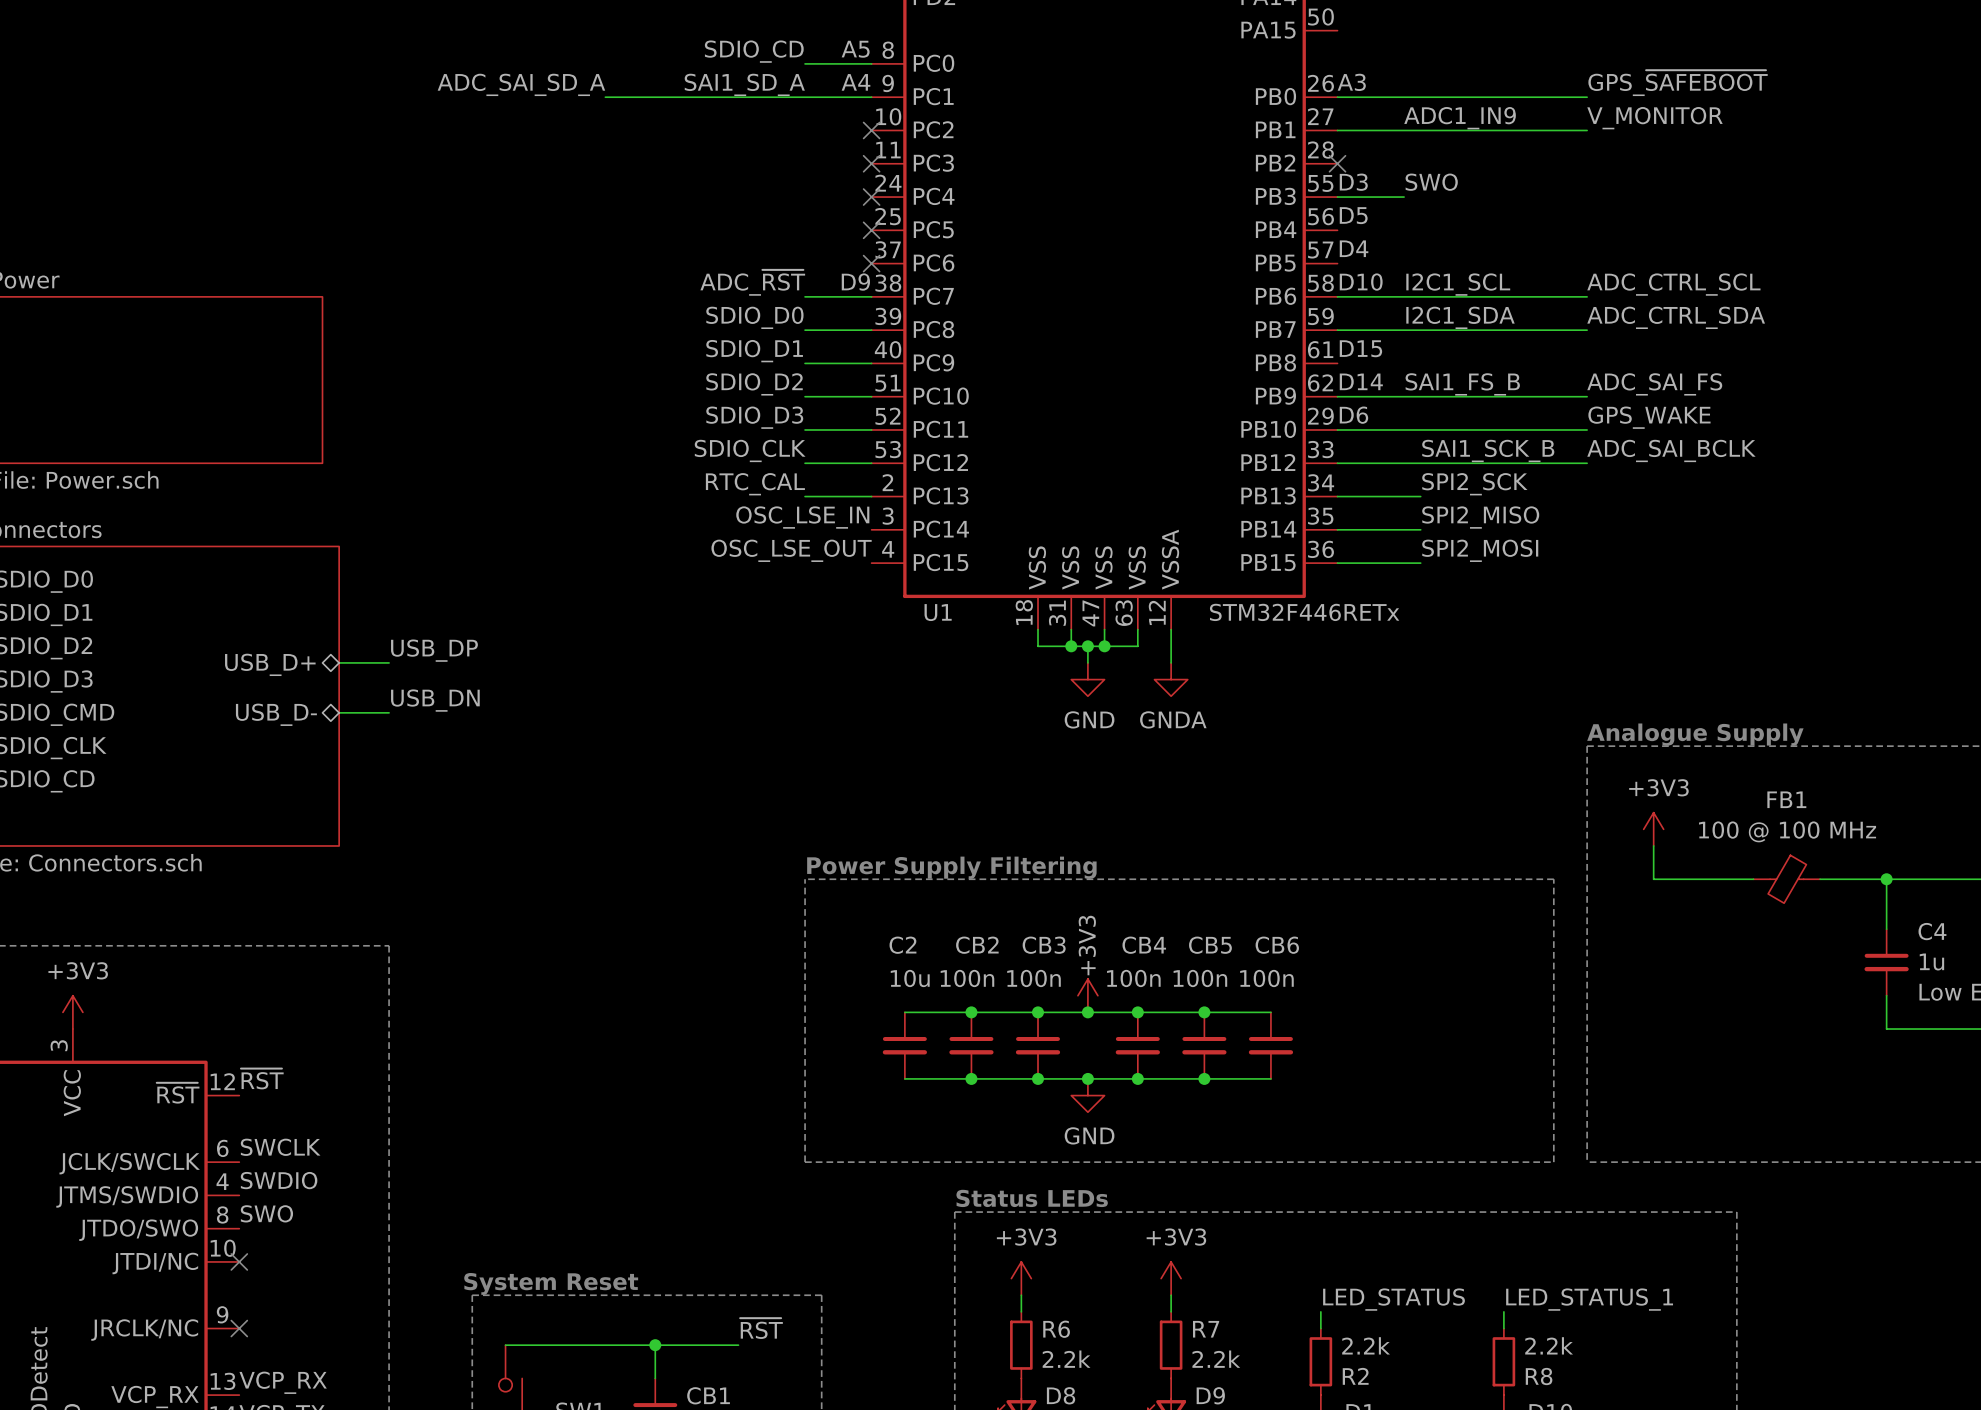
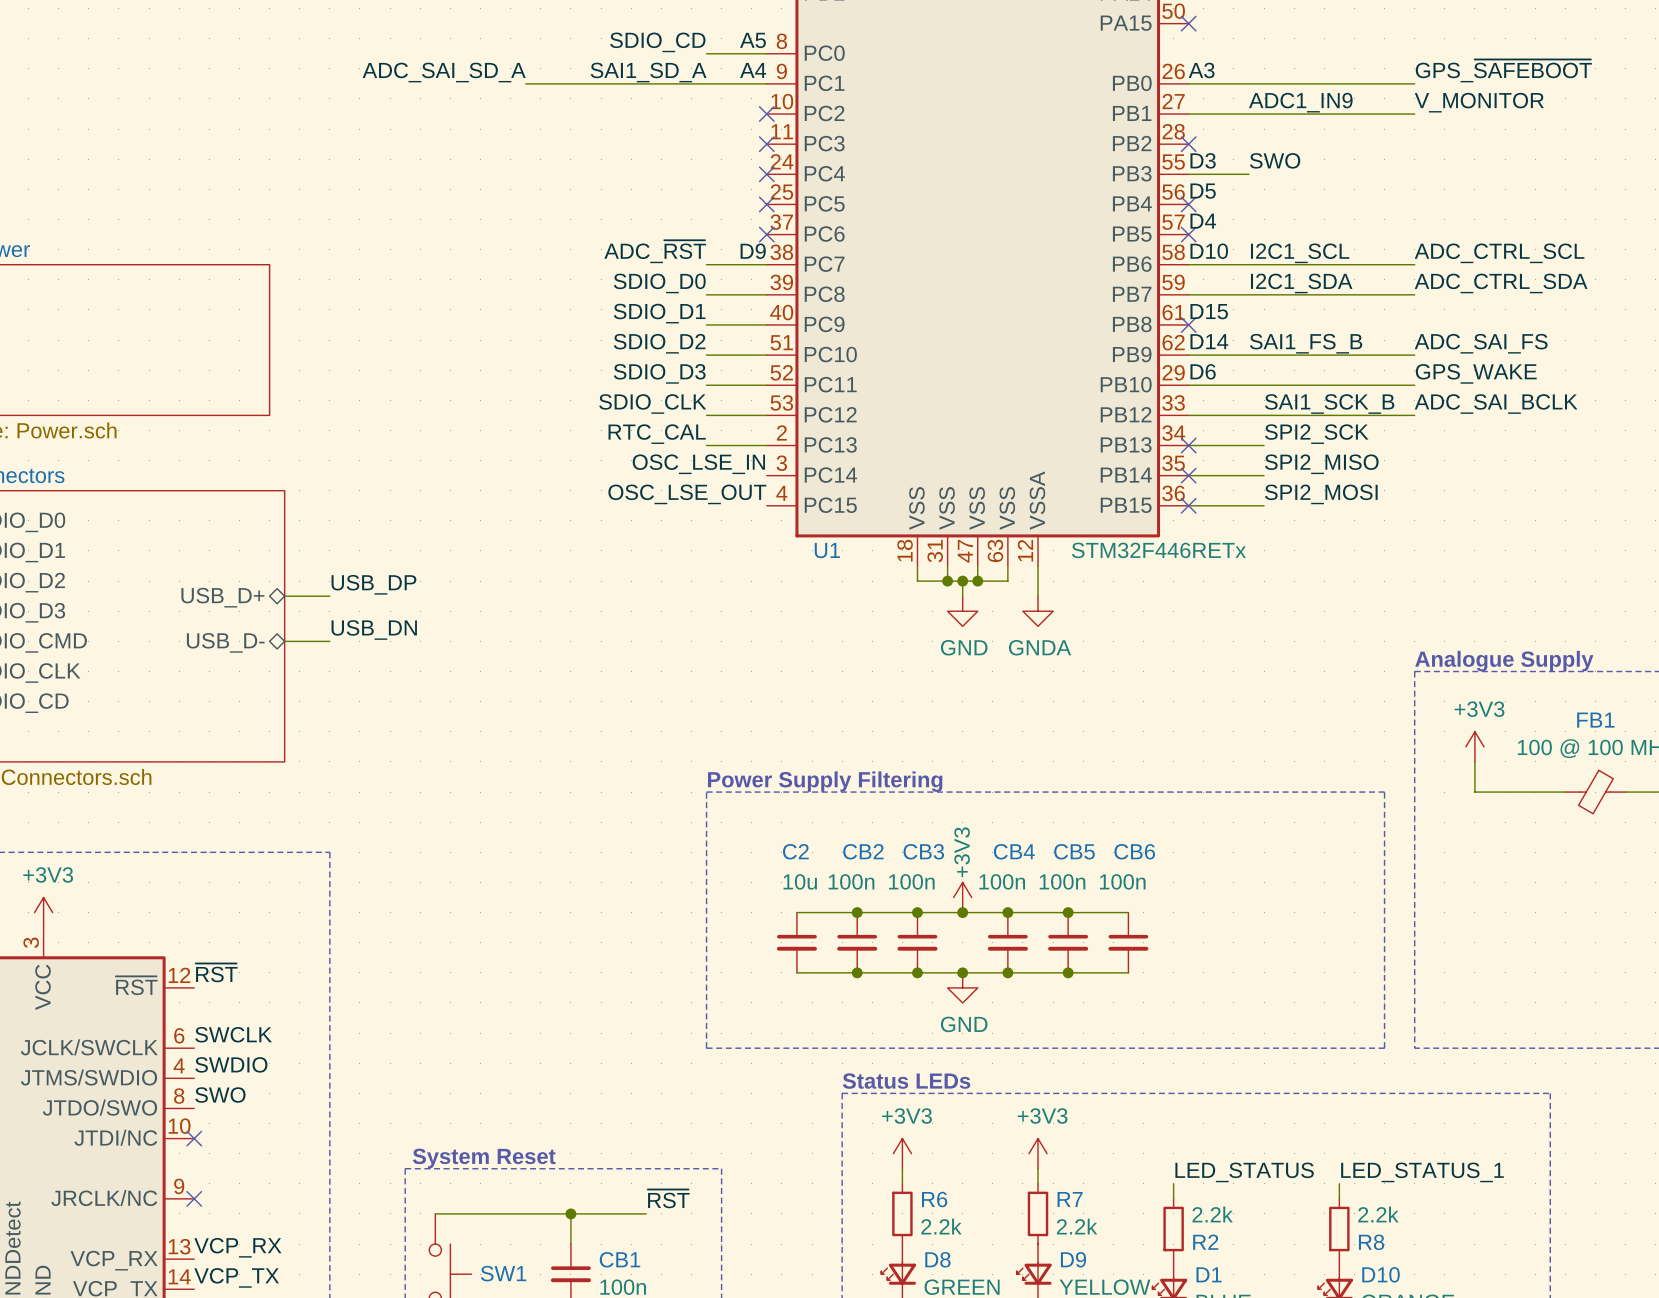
no-connect mark: none -> (1188, 23)
no-connect mark: none -> (1188, 204)
no-connect mark: none -> (1188, 234)
no-connect mark: none -> (1188, 324)
no-connect mark: none -> (1188, 445)
no-connect mark: none -> (1188, 475)
no-connect mark: none -> (1188, 505)

